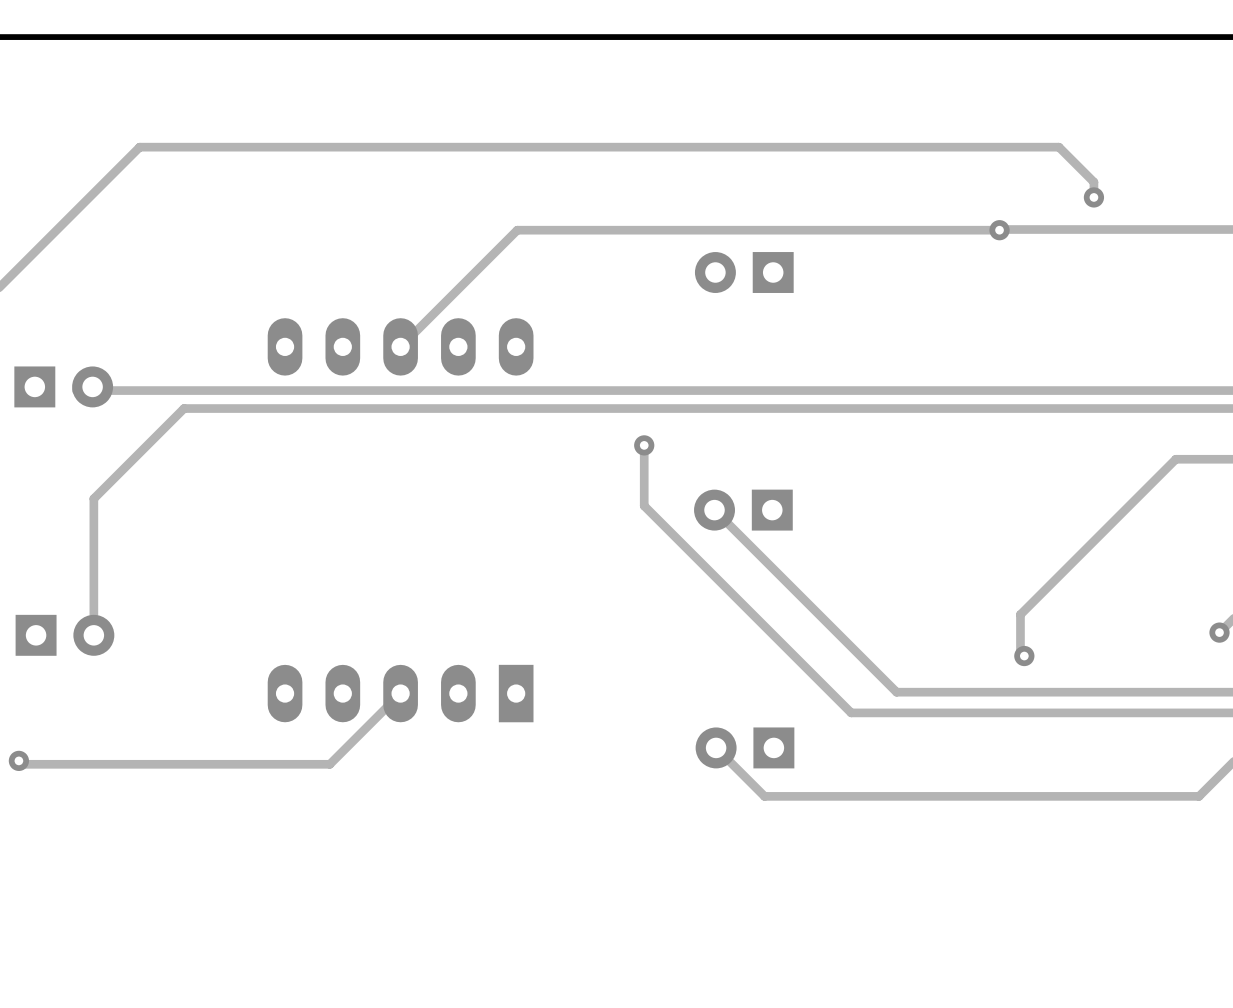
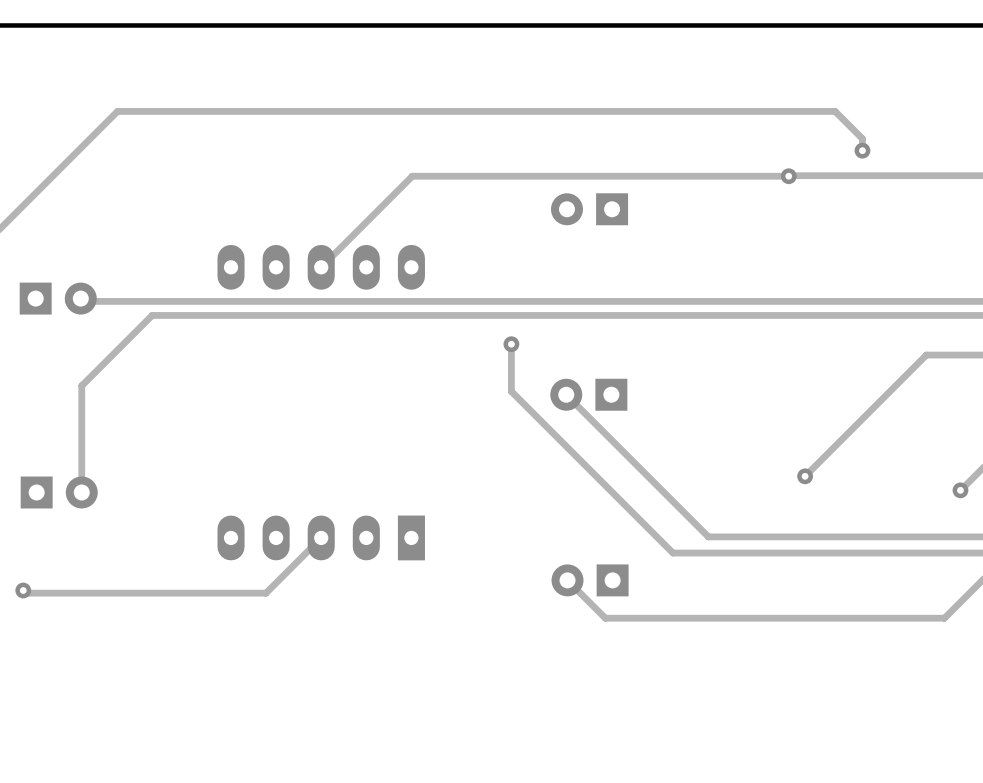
track: (1020, 614) (1020, 652) (1024, 656) -> none
via position: (1024, 656) -> (805, 476)

